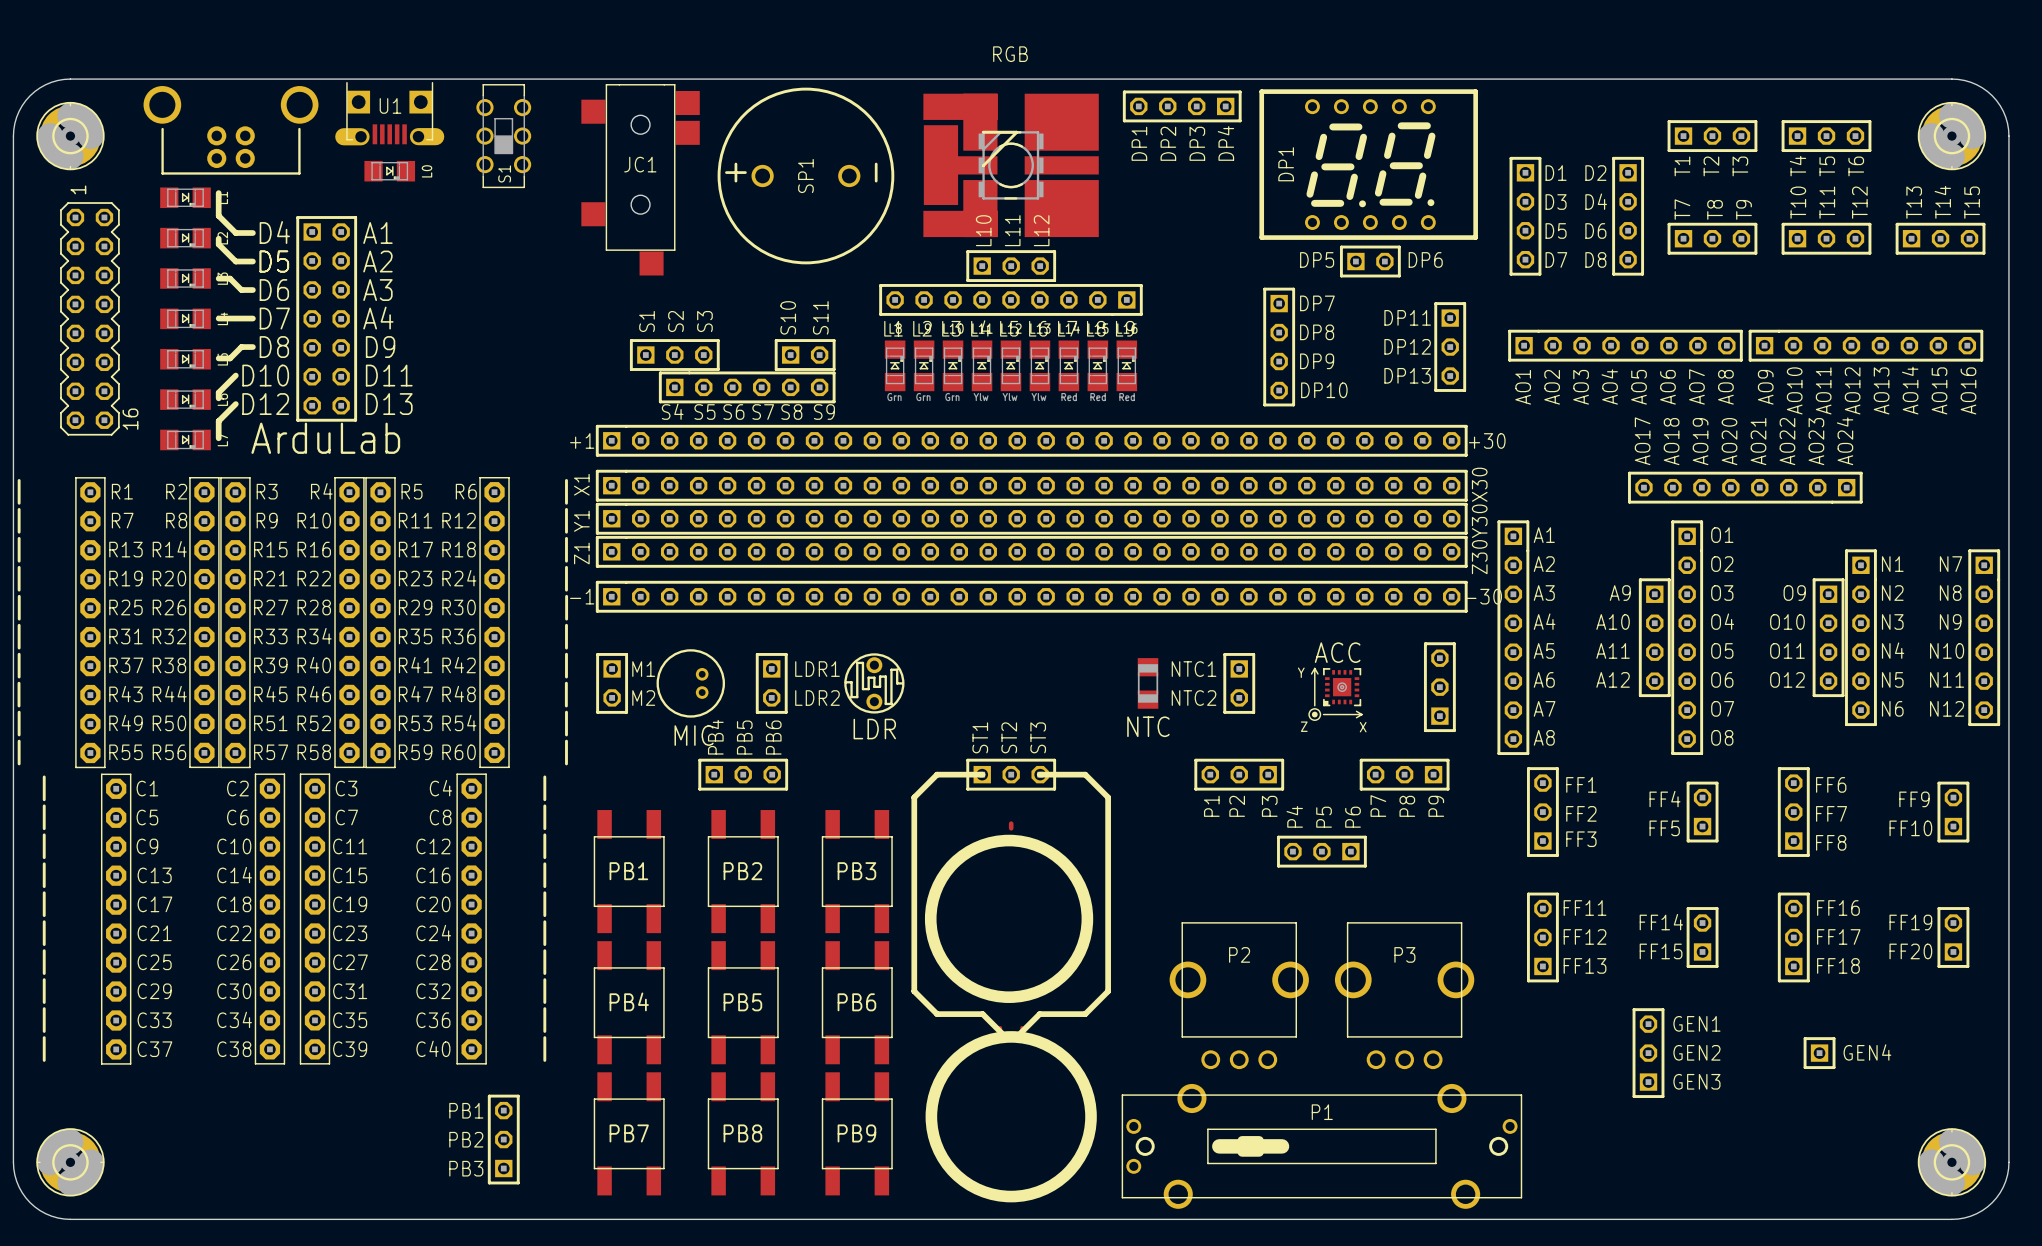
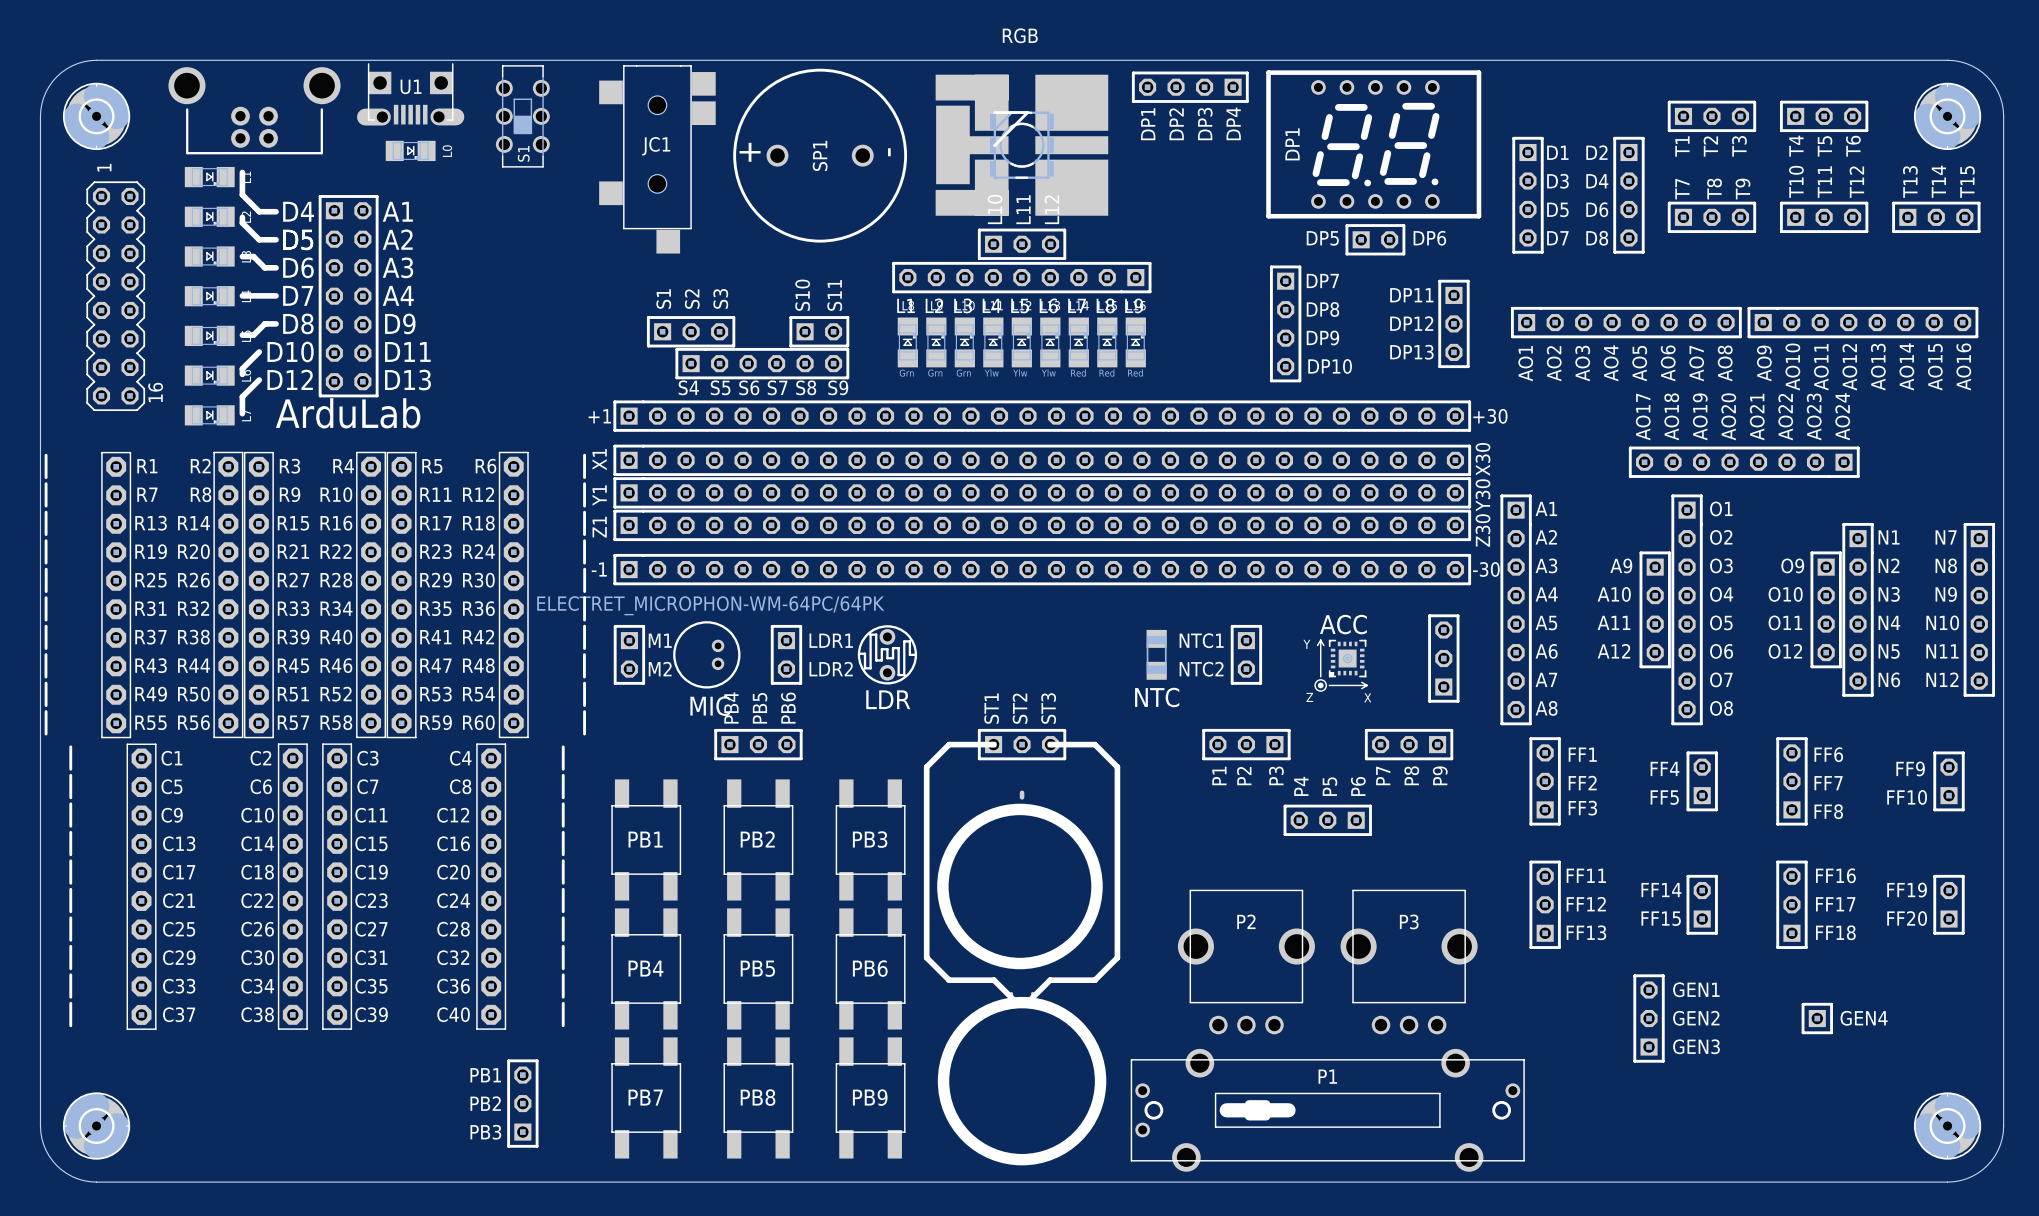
MIC value: none -> ELECTRET_MICROPHON-WM-64PC/64PK (710, 605)

